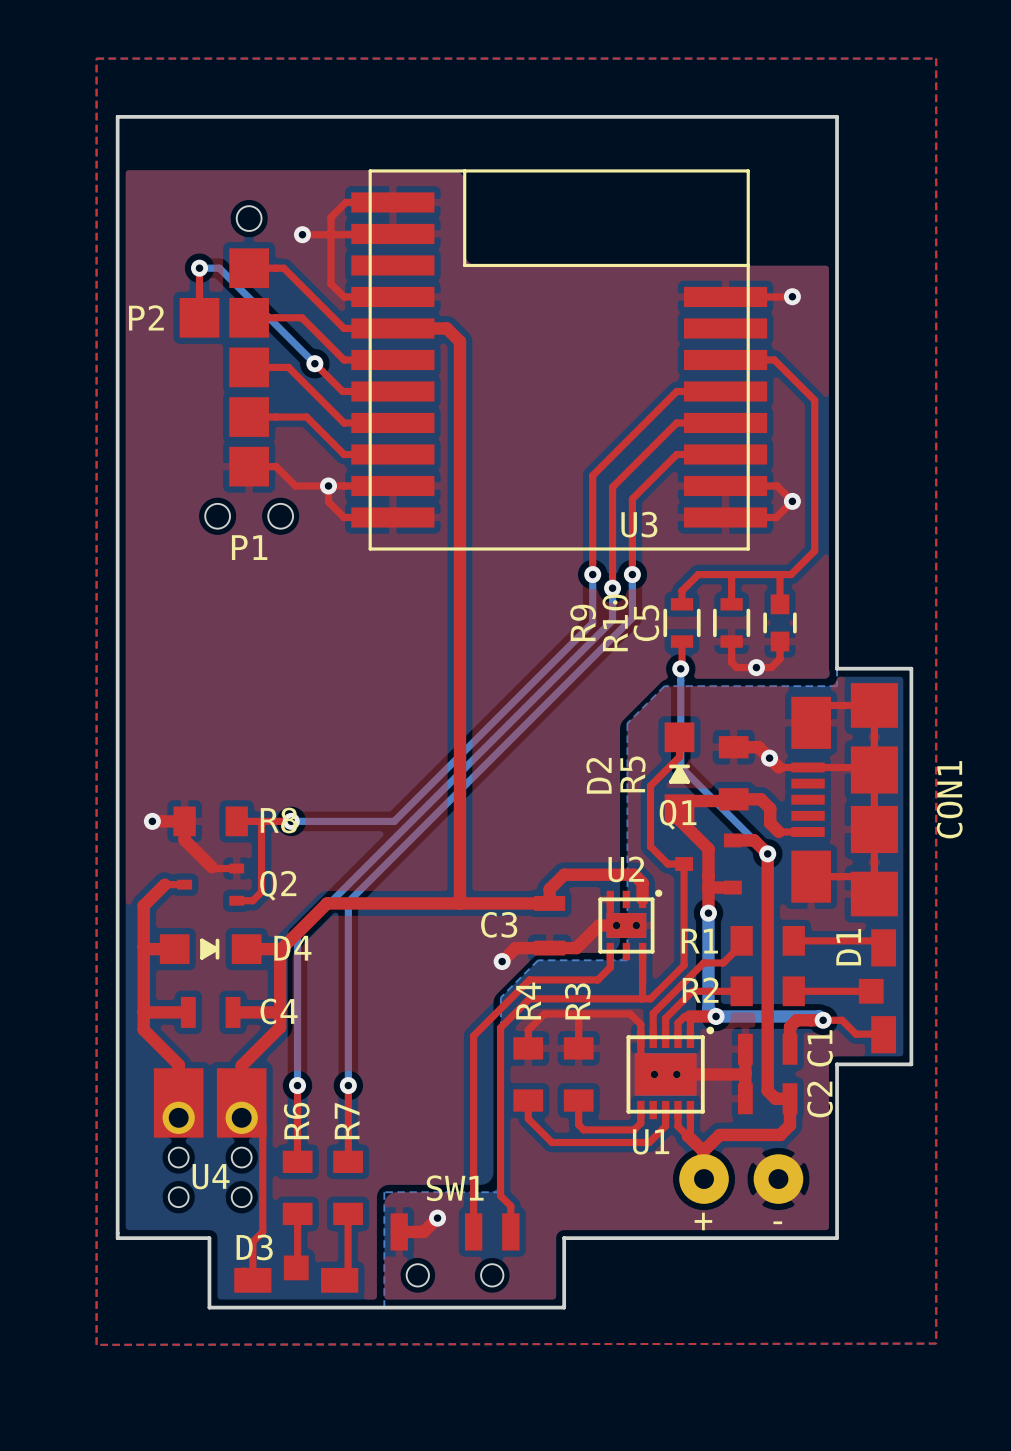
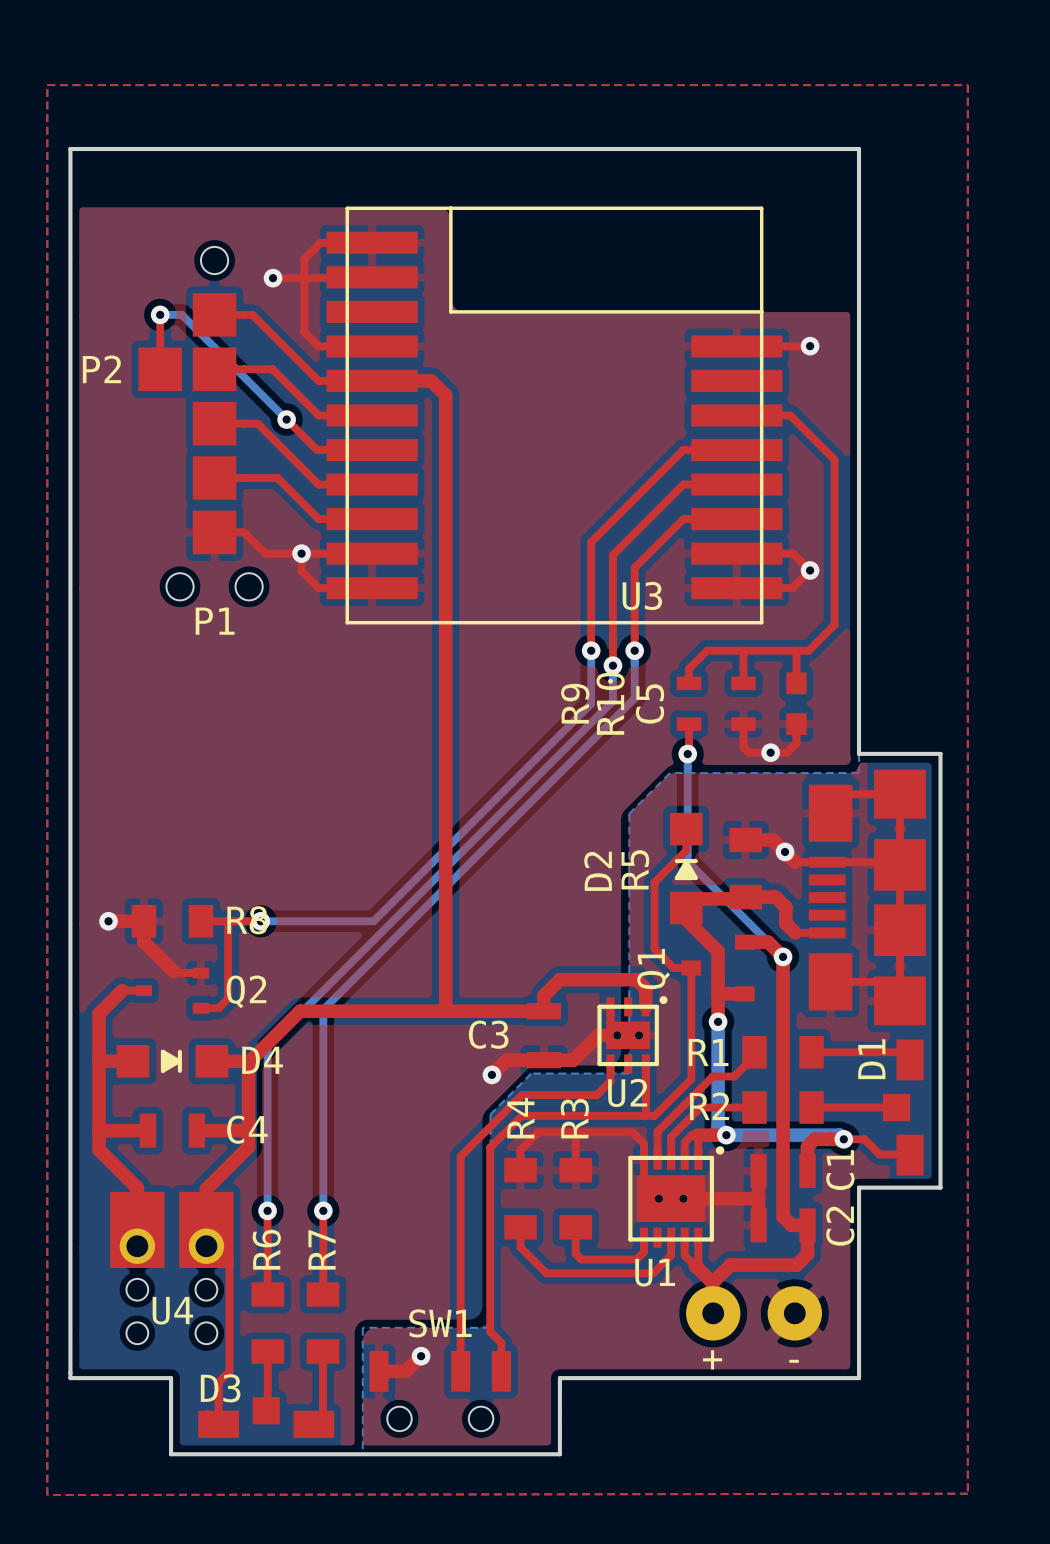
C5 footprint: [763, 594, 797, 652] -> [786, 672, 807, 736]
R9 footprint: [663, 598, 701, 648] -> [676, 676, 702, 731]
R10 footprint: [713, 598, 751, 648] -> [731, 676, 756, 731]
CON1 name: CON1 (949, 799) -> none
Q1 name rotation: 0° (678, 814) -> 90° counterclockwise (653, 969)
U2 name position: U2 (626, 869) -> U2 (627, 1092)

